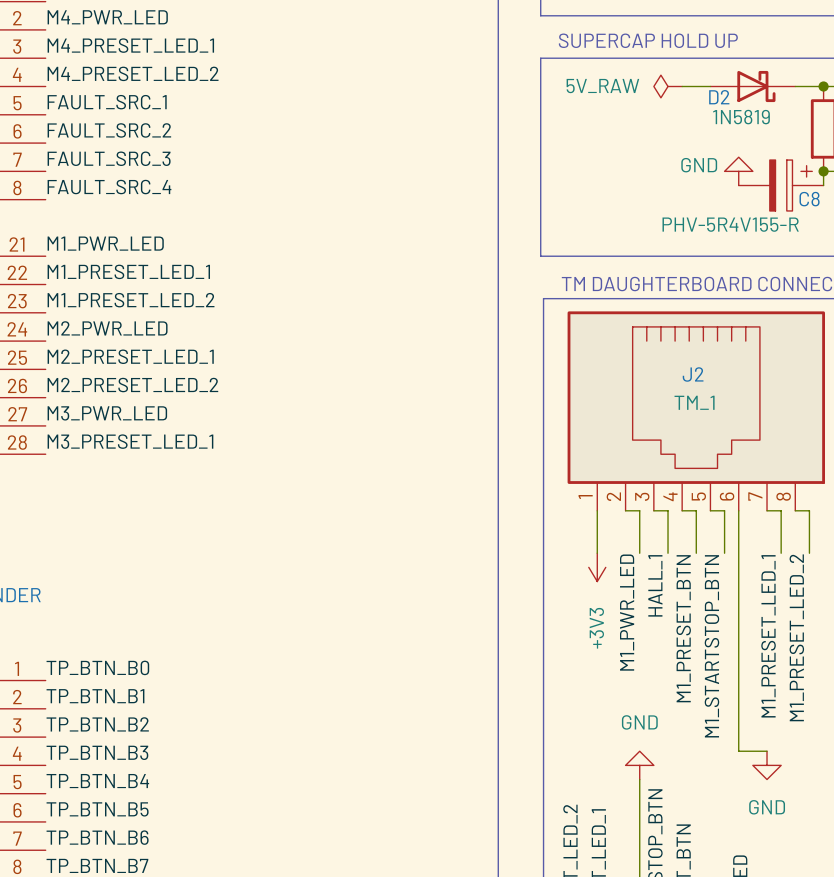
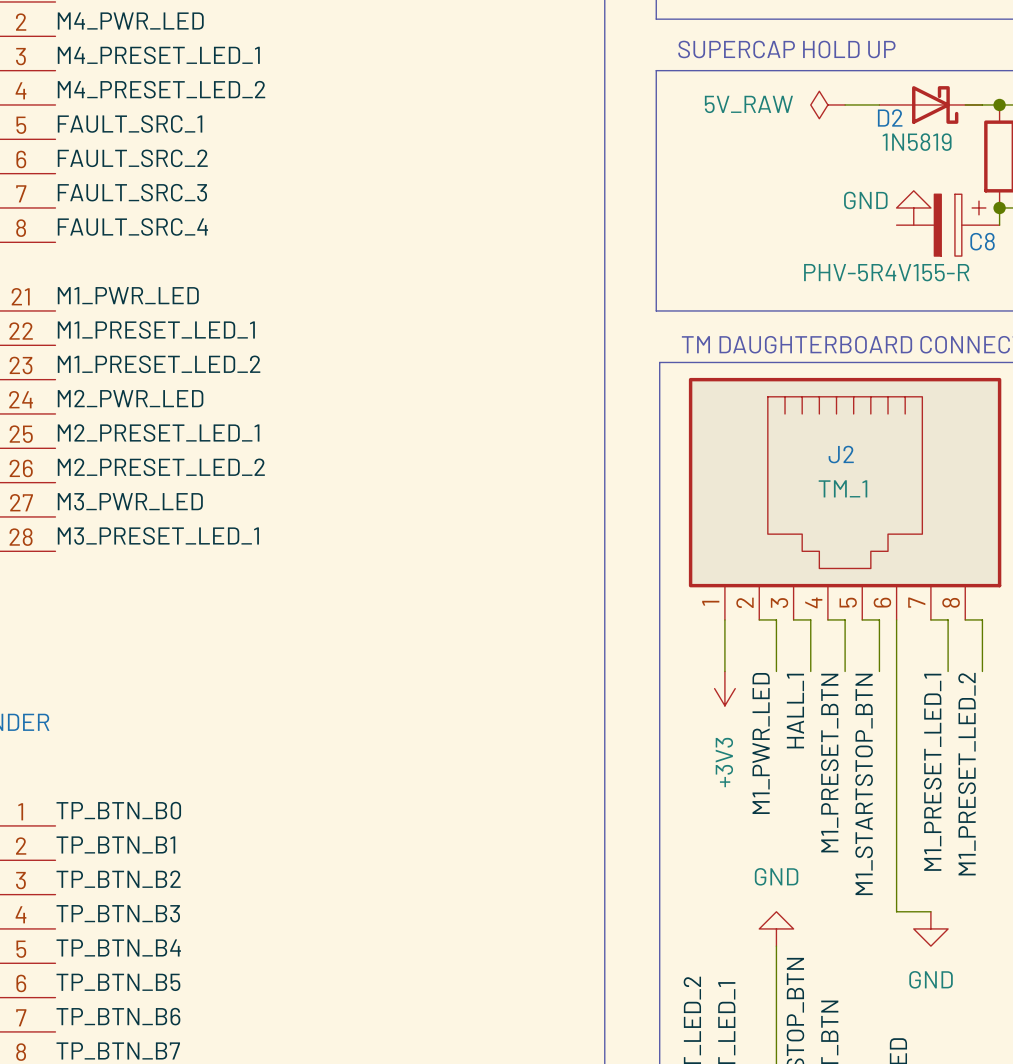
power symbol position: 5V_RAW (668, 86) -> 5V_RAW (827, 104)
D2 position: (752, 86) -> (930, 104)
power symbol position: GND (738, 171) -> GND (913, 207)

